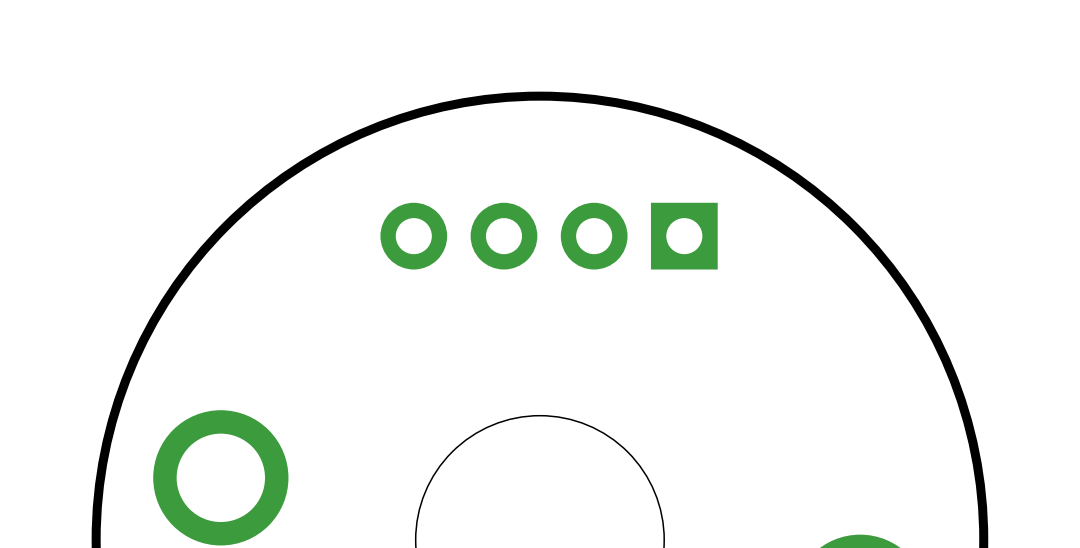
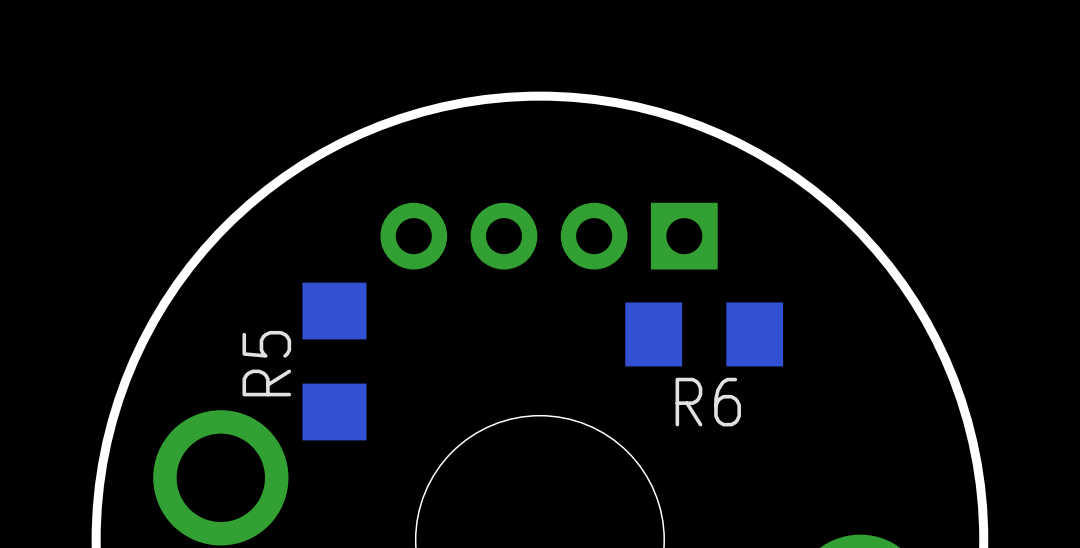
R6: none -> (704, 334)
R5: none -> (334, 361)

